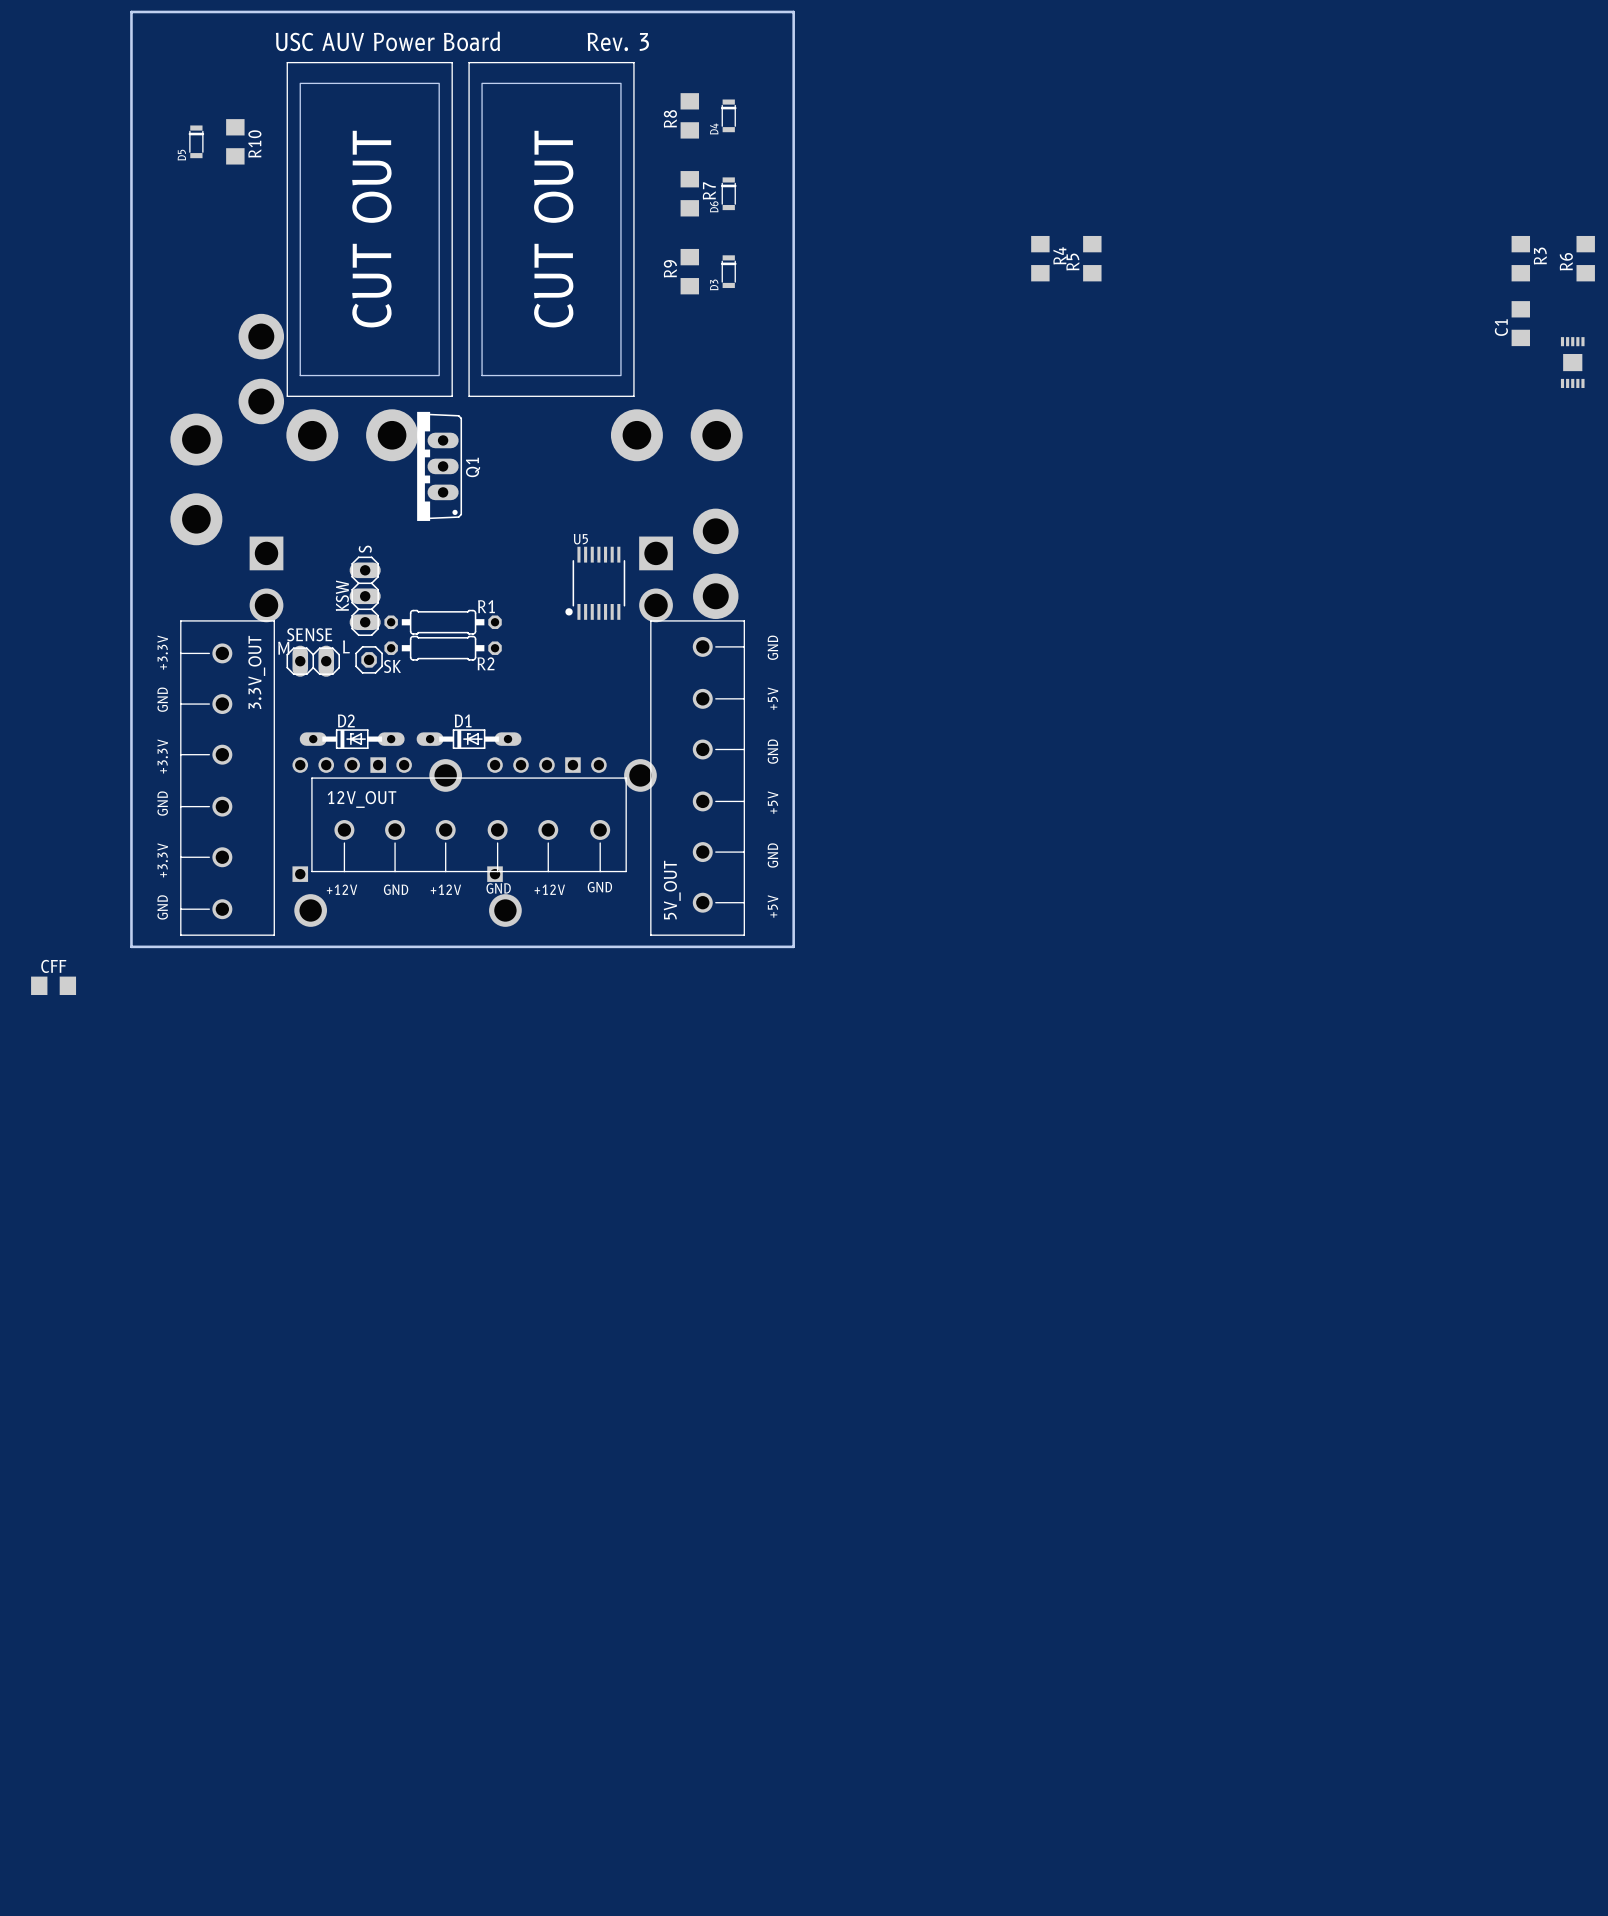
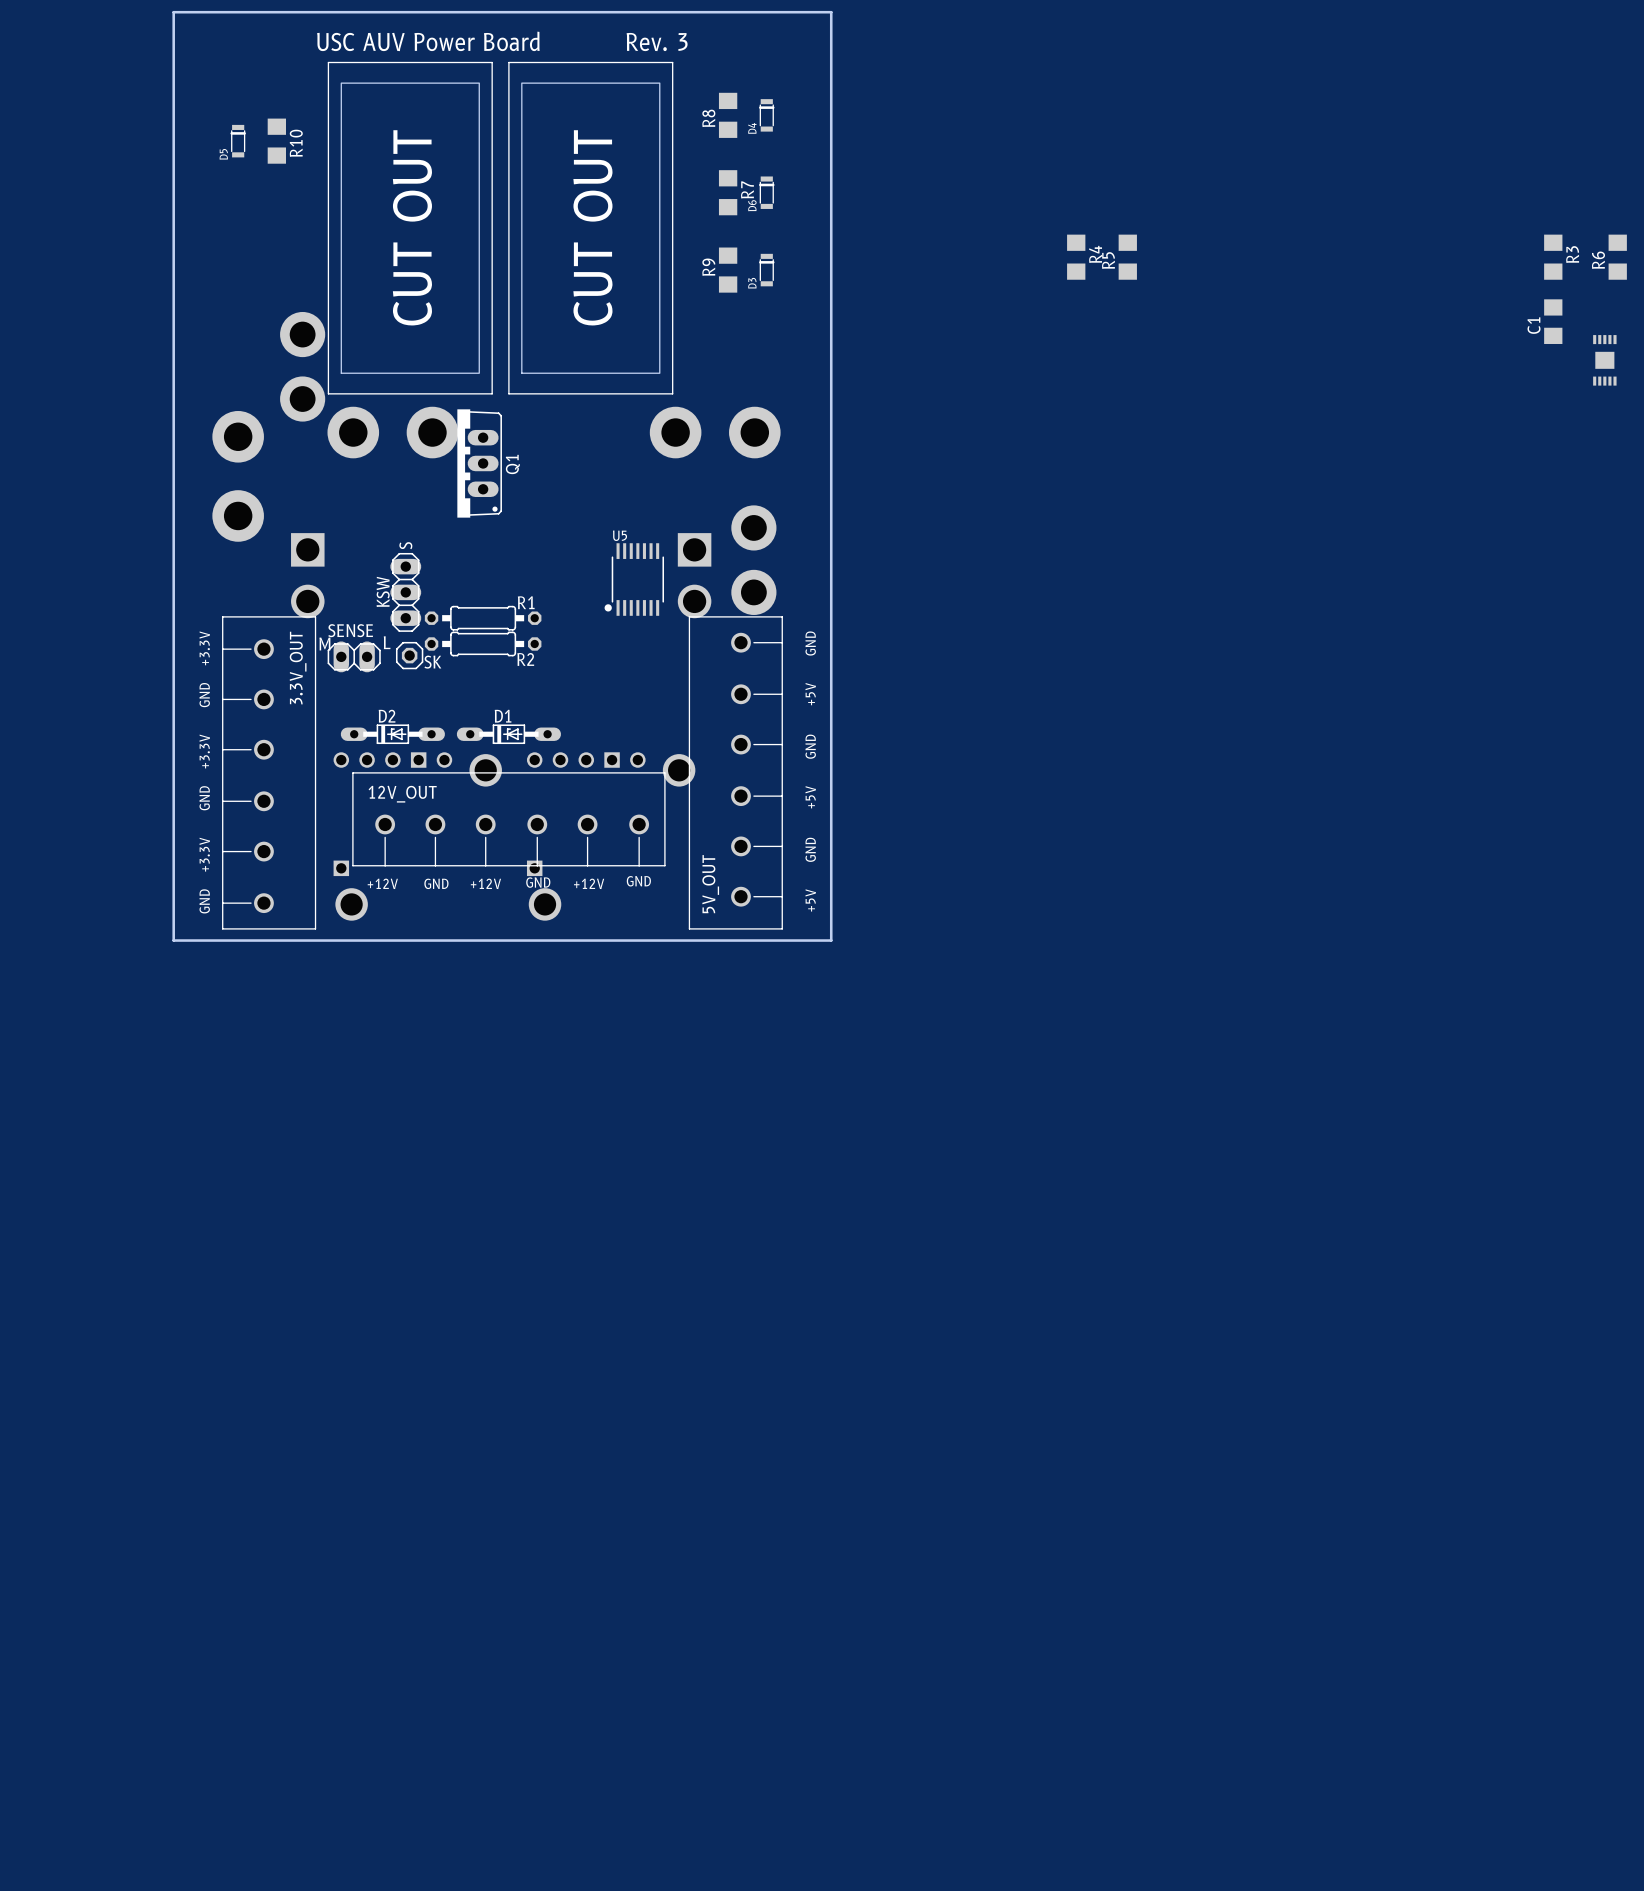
CFF: (53, 985) -> none

